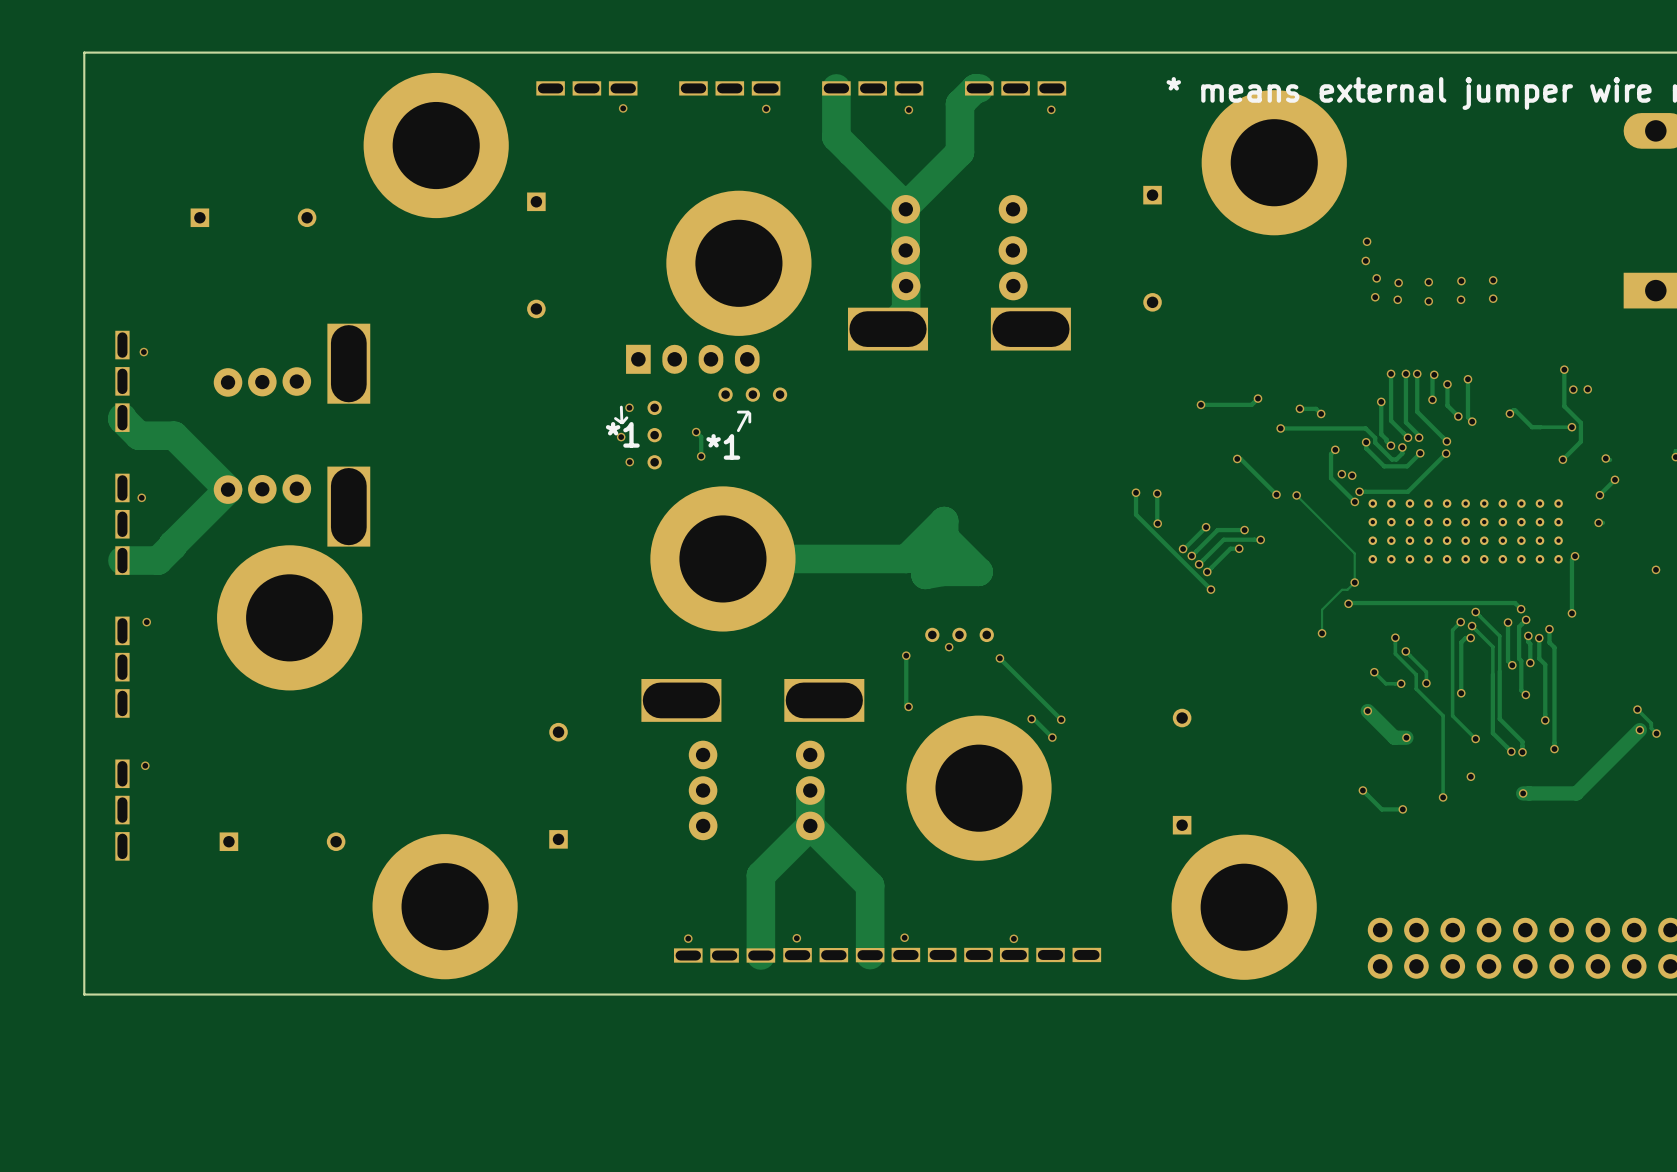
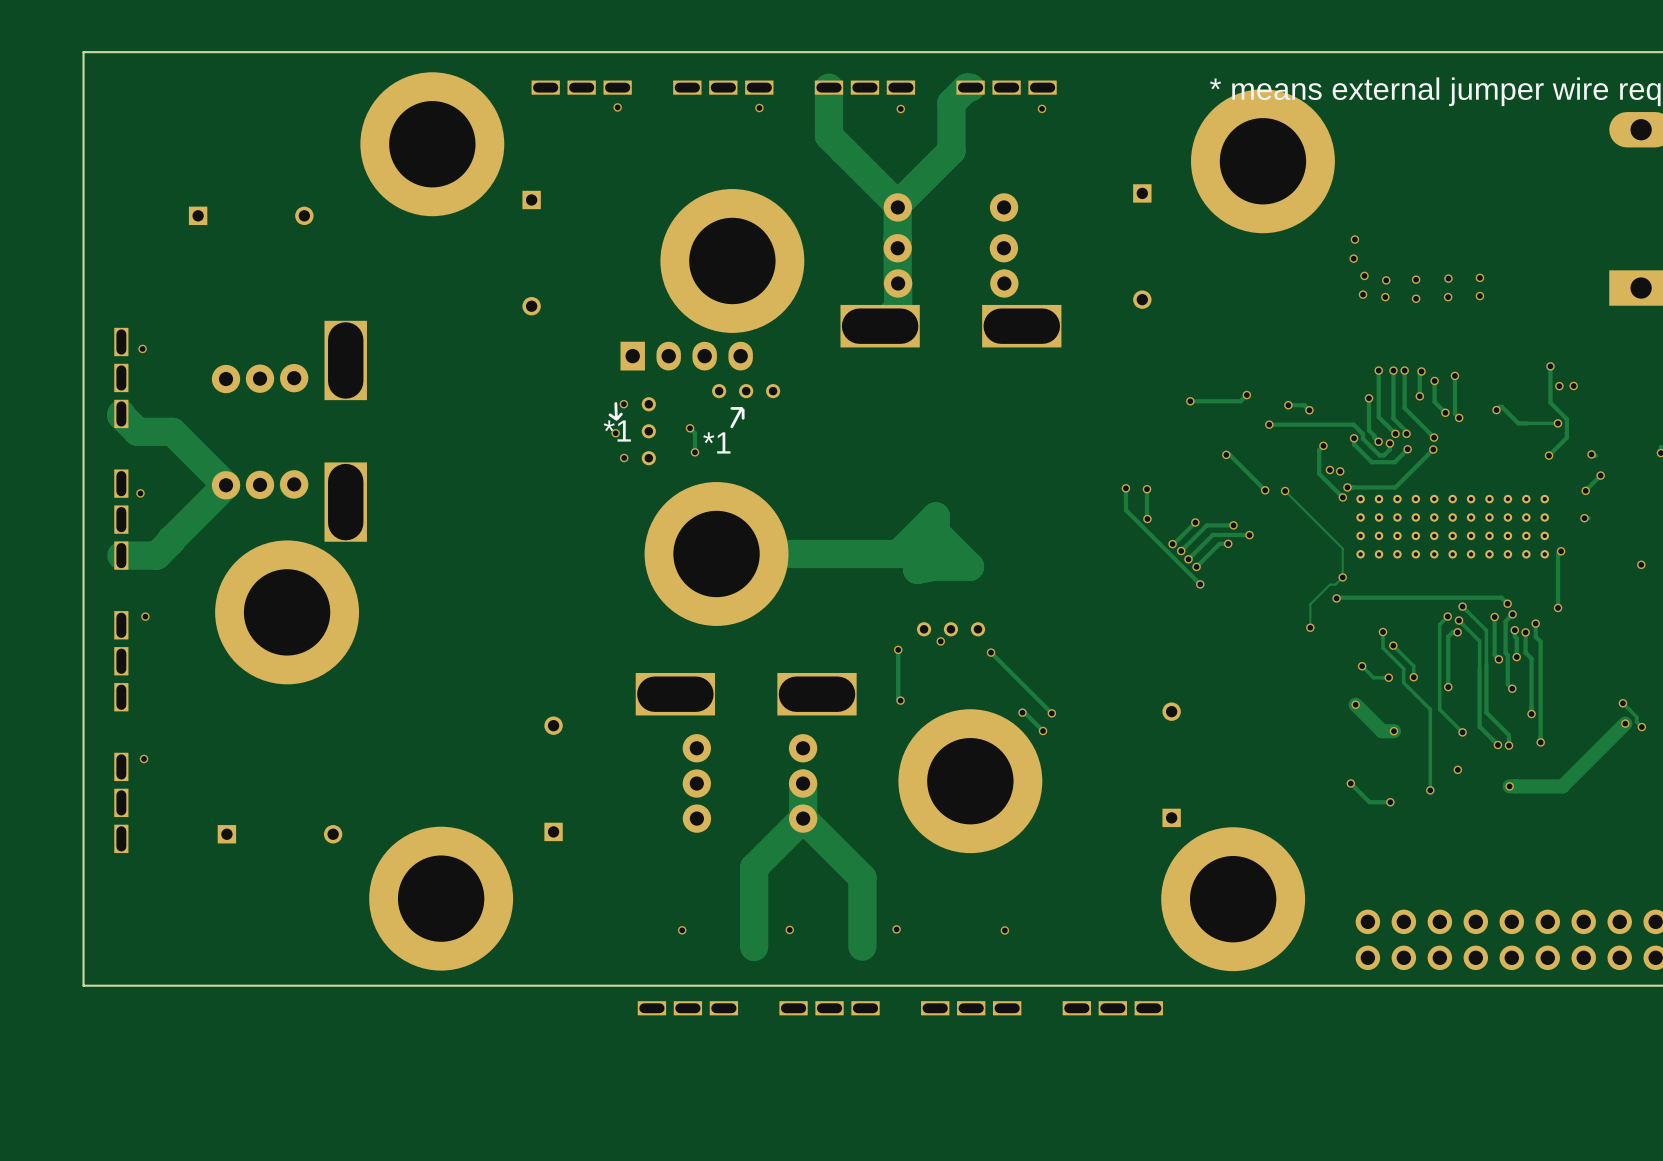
part: (942, 954) -> none
part: (1050, 954) -> none
part: (724, 955) -> none
part: (833, 955) -> none
part: none -> (687, 1008)
part: none -> (829, 1008)
part: none -> (971, 1008)
part: none -> (1112, 1008)

